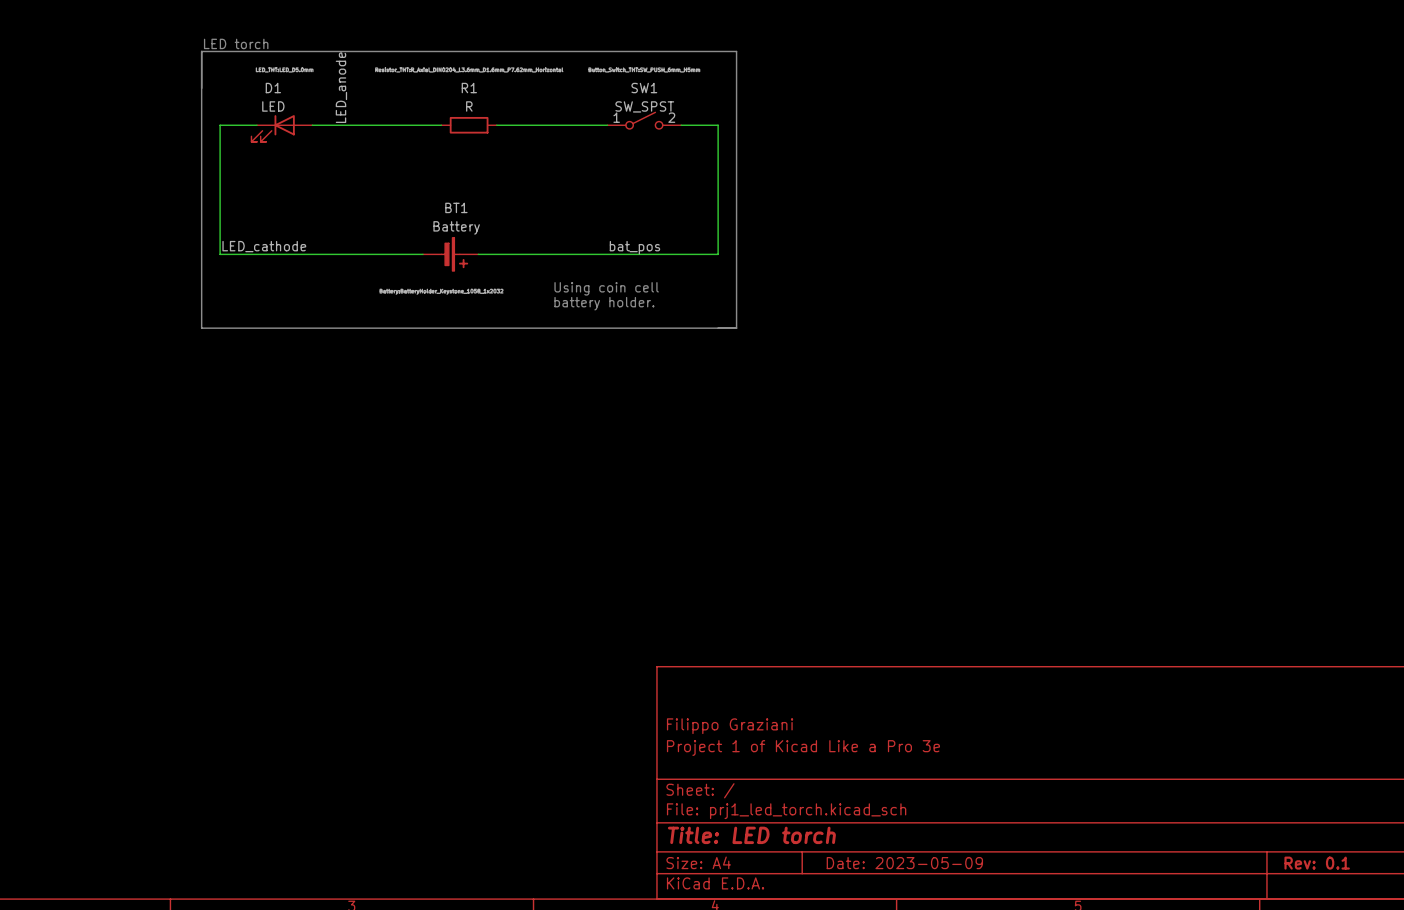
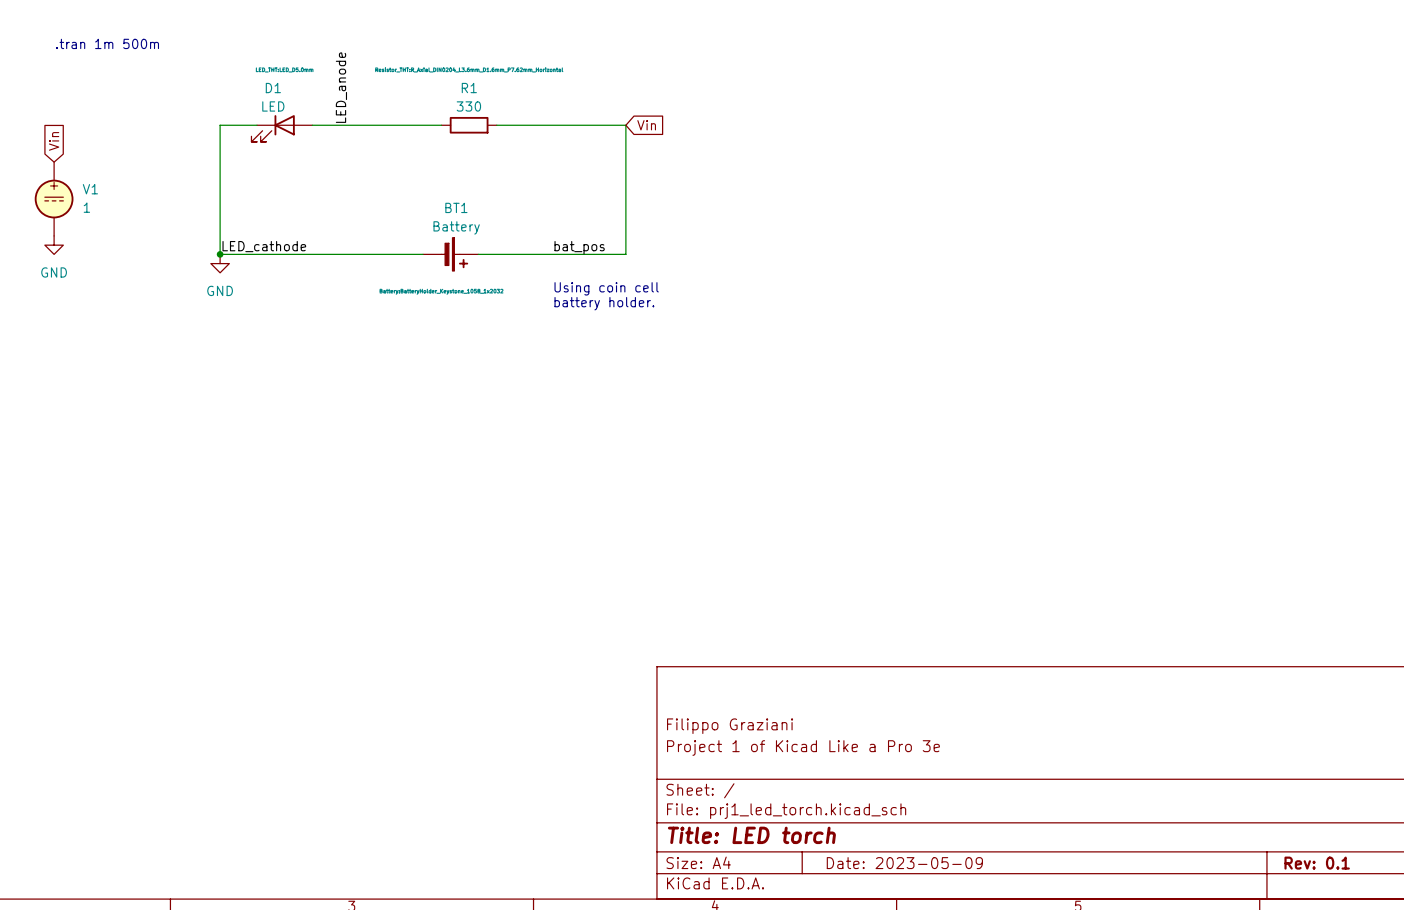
text: none -> .tran 1m 500m (107, 43)
text: LED torch (236, 43) -> none
line: (201, 51) (201, 328) (736, 328) (736, 51) (201, 51) -> none
R1 value: R (469, 106) -> 330 (468, 106)
SW1: SW_SPST (644, 120) -> none
global label: none -> Vin (646, 125)
wire: (681, 125) (718, 125) (718, 254) (625, 254) -> (607, 125) (625, 125) (625, 254)
global label: none -> Vin (54, 141)
V1: none -> 1 (54, 199)
power symbol: none -> GND (54, 245)
label position: bat_pos (634, 247) -> bat_pos (579, 247)
junction: none -> (220, 254)
power symbol: none -> GND (220, 263)

